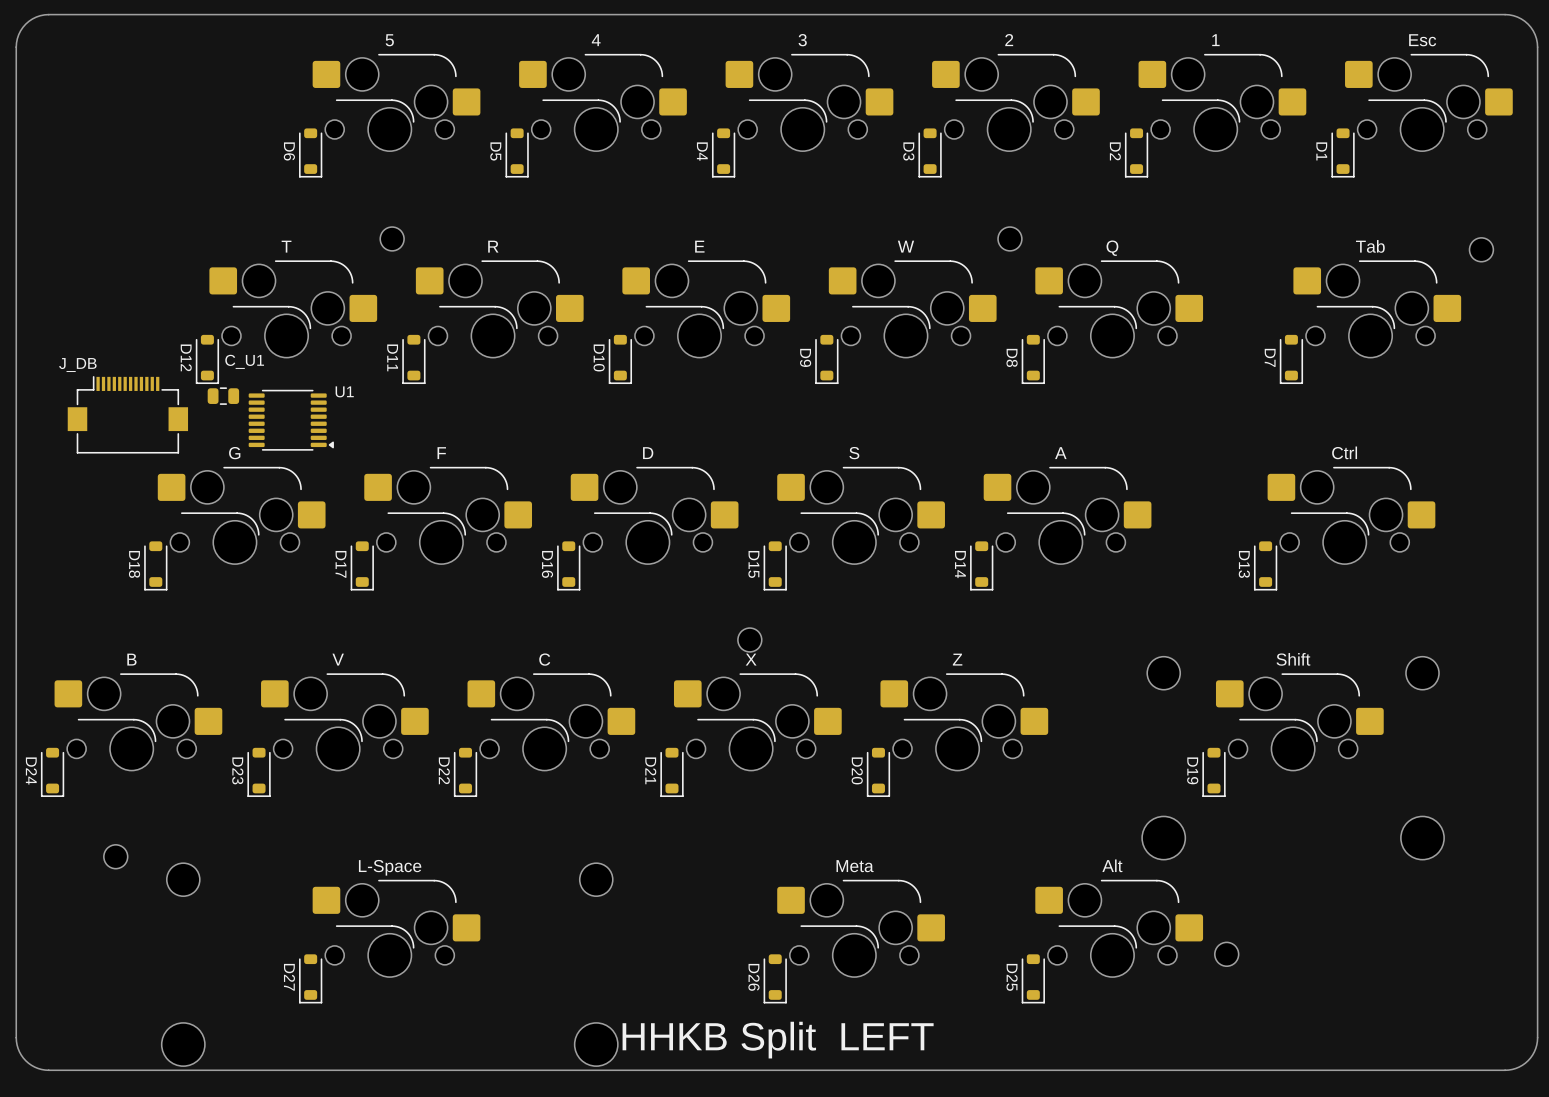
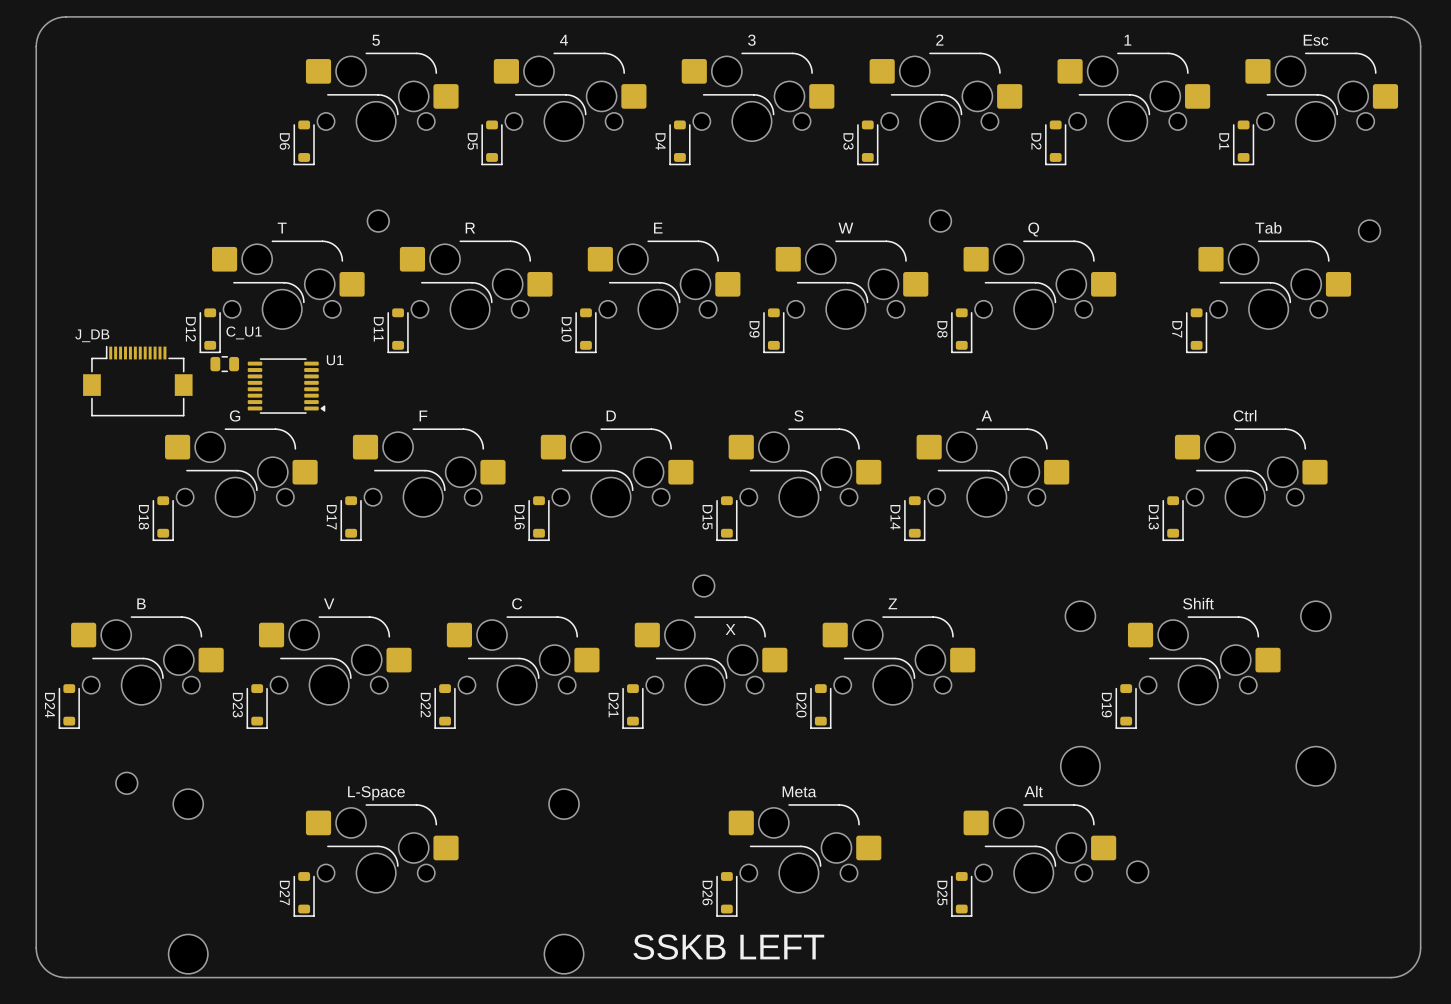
text position: X (751, 659) -> X (730, 629)
text: HHKB Split LEFT (778, 1040) -> SSKB LEFT (728, 947)

